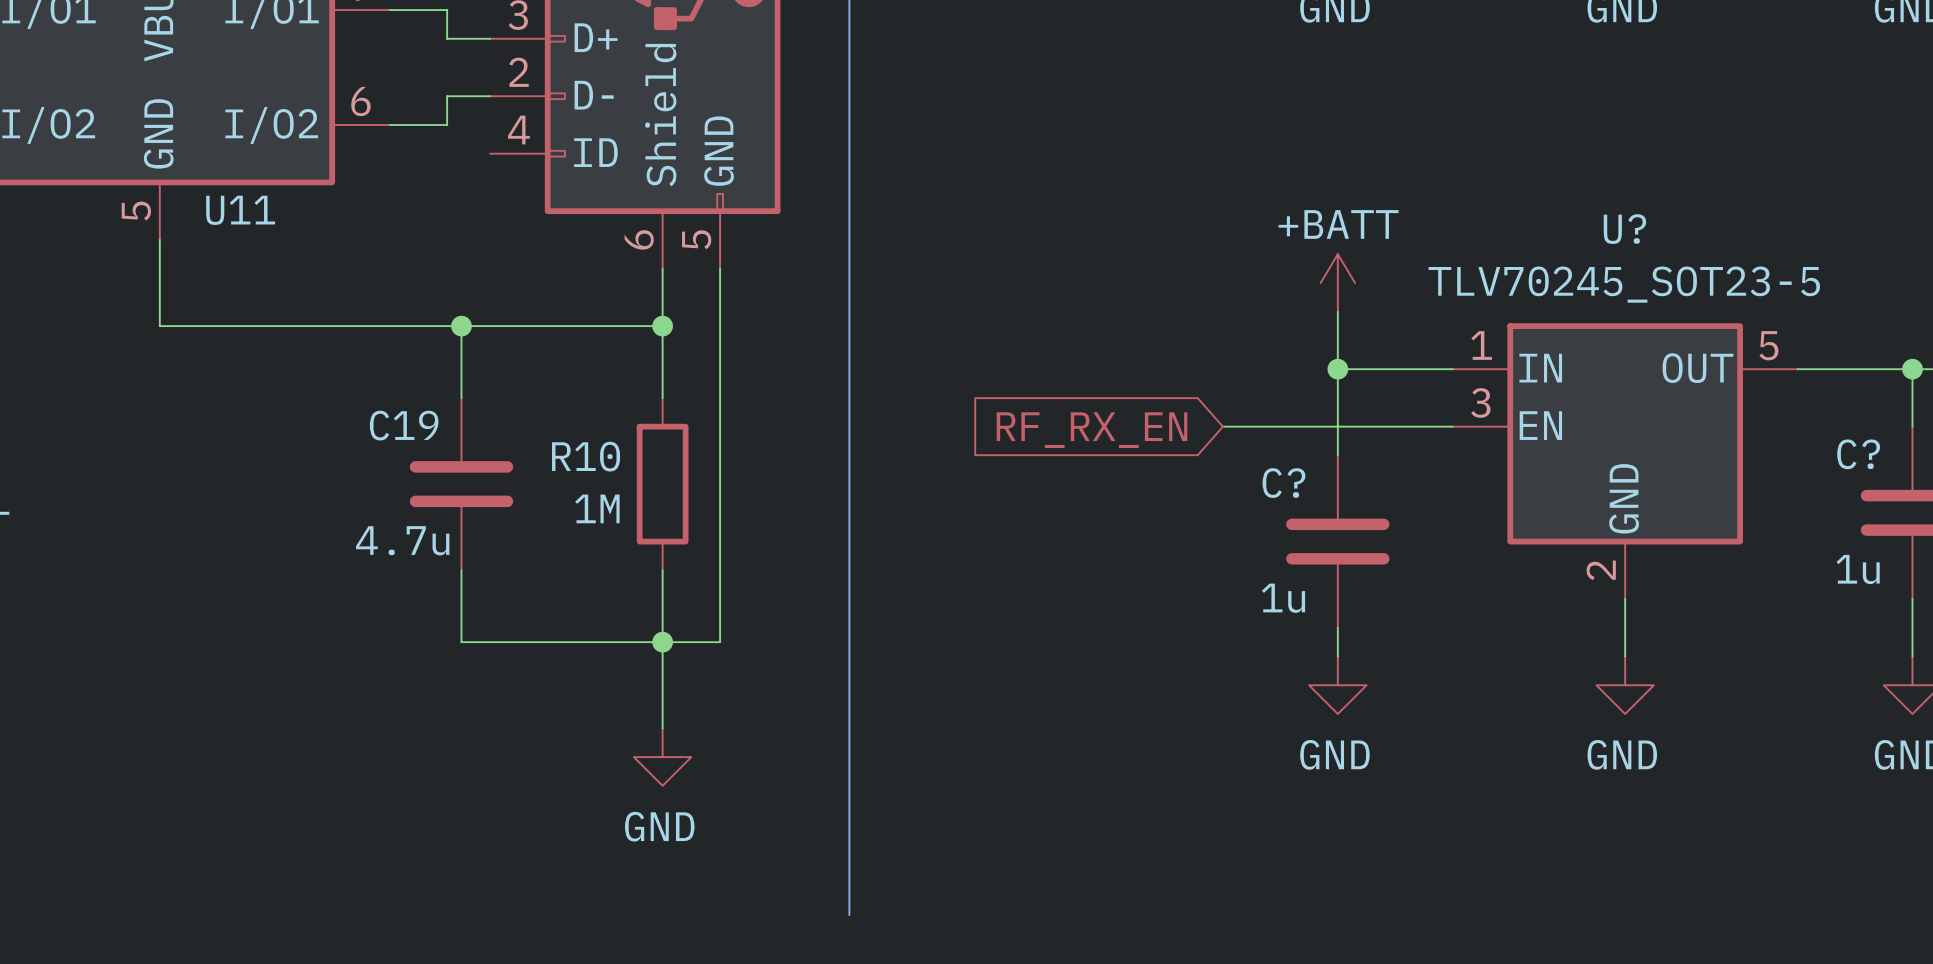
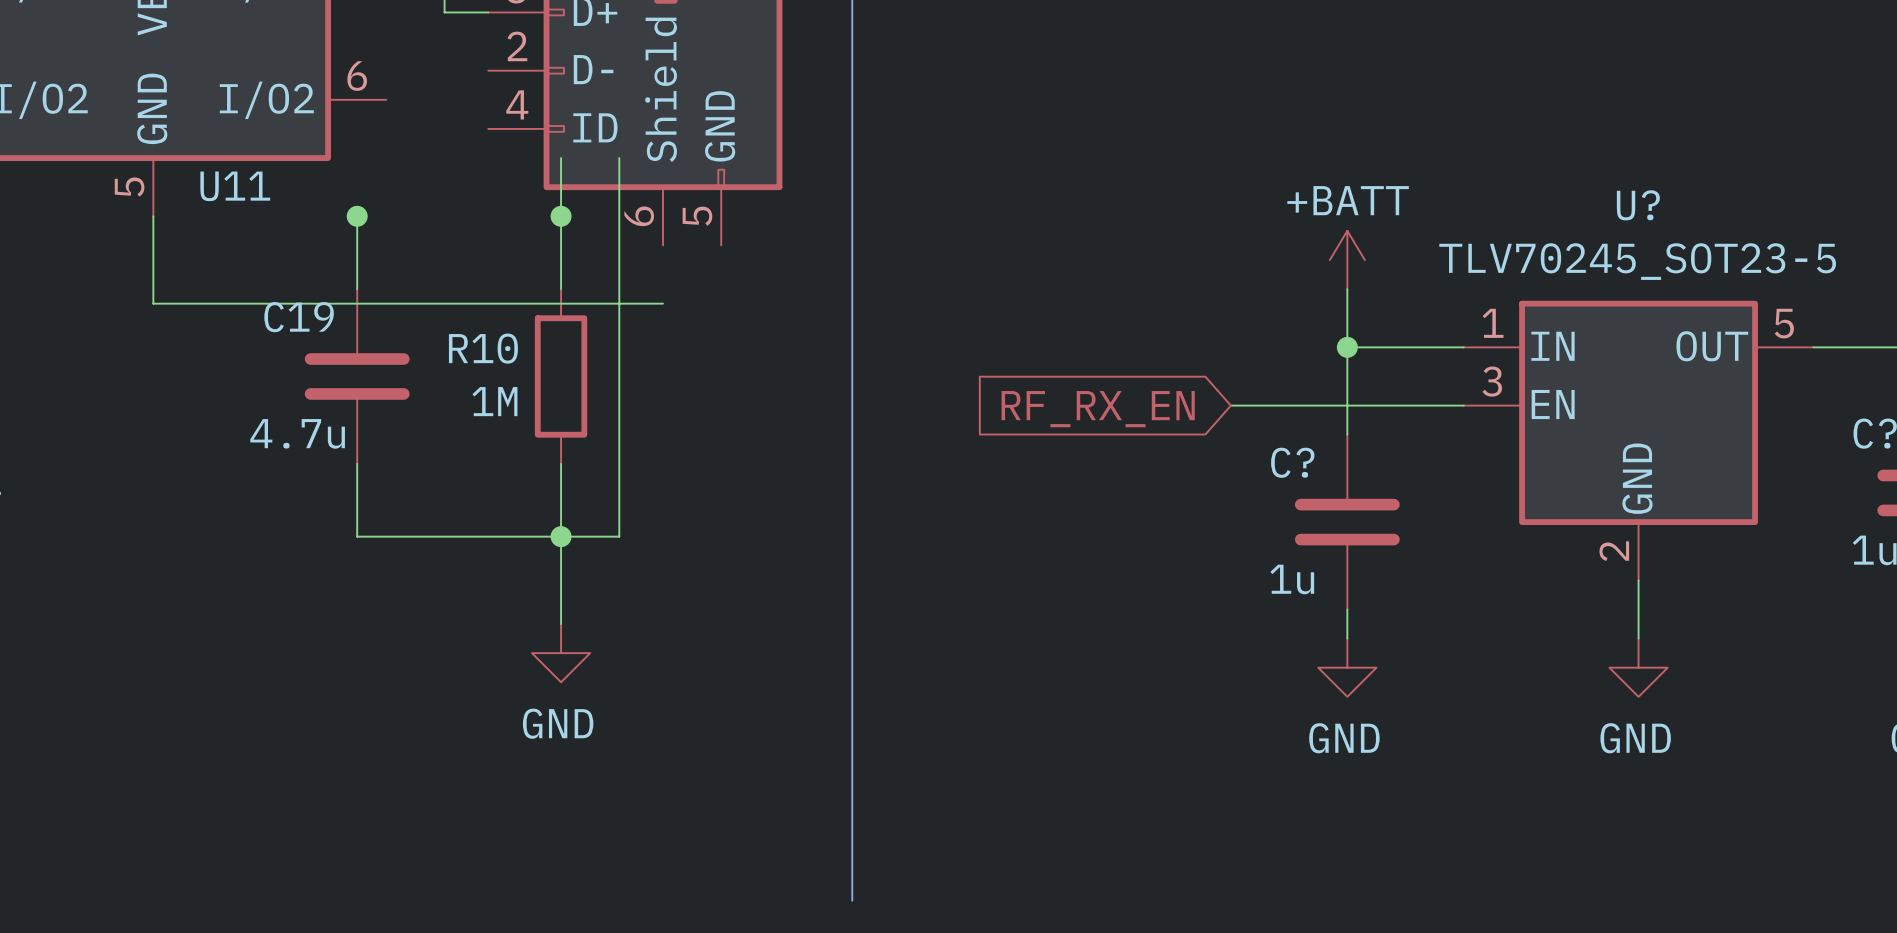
wire: (490, 96) (447, 96) (447, 124) (389, 124) -> none
junction: none -> (357, 216)
junction: none -> (561, 216)
wire: (662, 268) (662, 397) -> (561, 158) (561, 289)
wire: (720, 268) (720, 642) (461, 642) (461, 570) -> (619, 158) (619, 536) (357, 536) (357, 463)
wire: (461, 326) (461, 397) -> (357, 216) (357, 289)
junction: (461, 326) -> none
junction: (662, 326) -> none
C19 position: (461, 484) -> (357, 376)
R10 position: (662, 484) -> (561, 376)
junction: none -> (561, 536)
wire: (662, 570) (662, 728) -> (561, 463) (561, 624)
junction: (662, 642) -> none
power symbol position: GND (662, 757) -> GND (561, 653)

